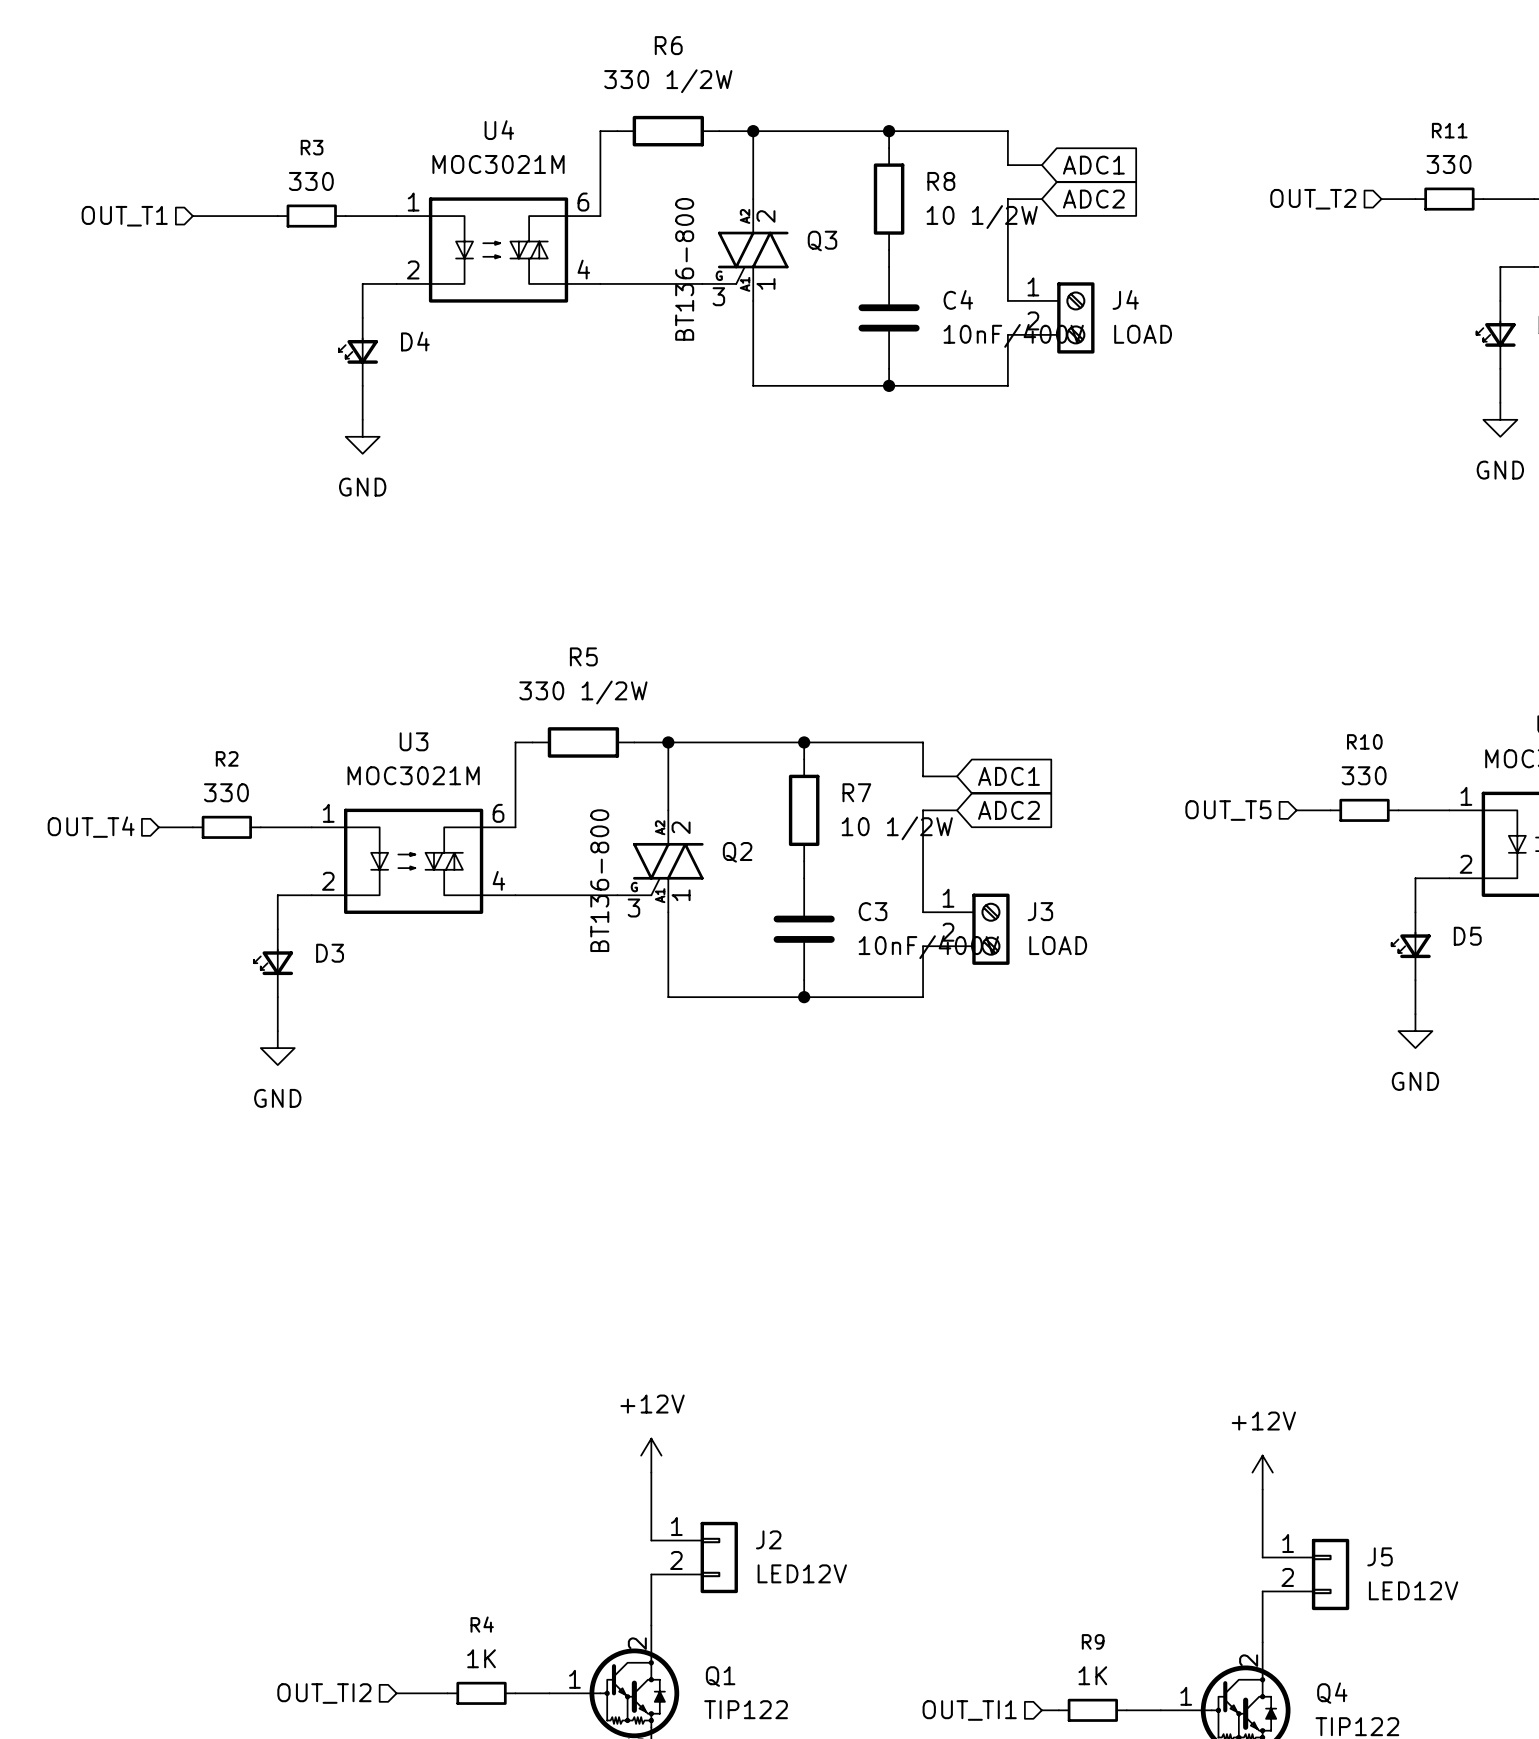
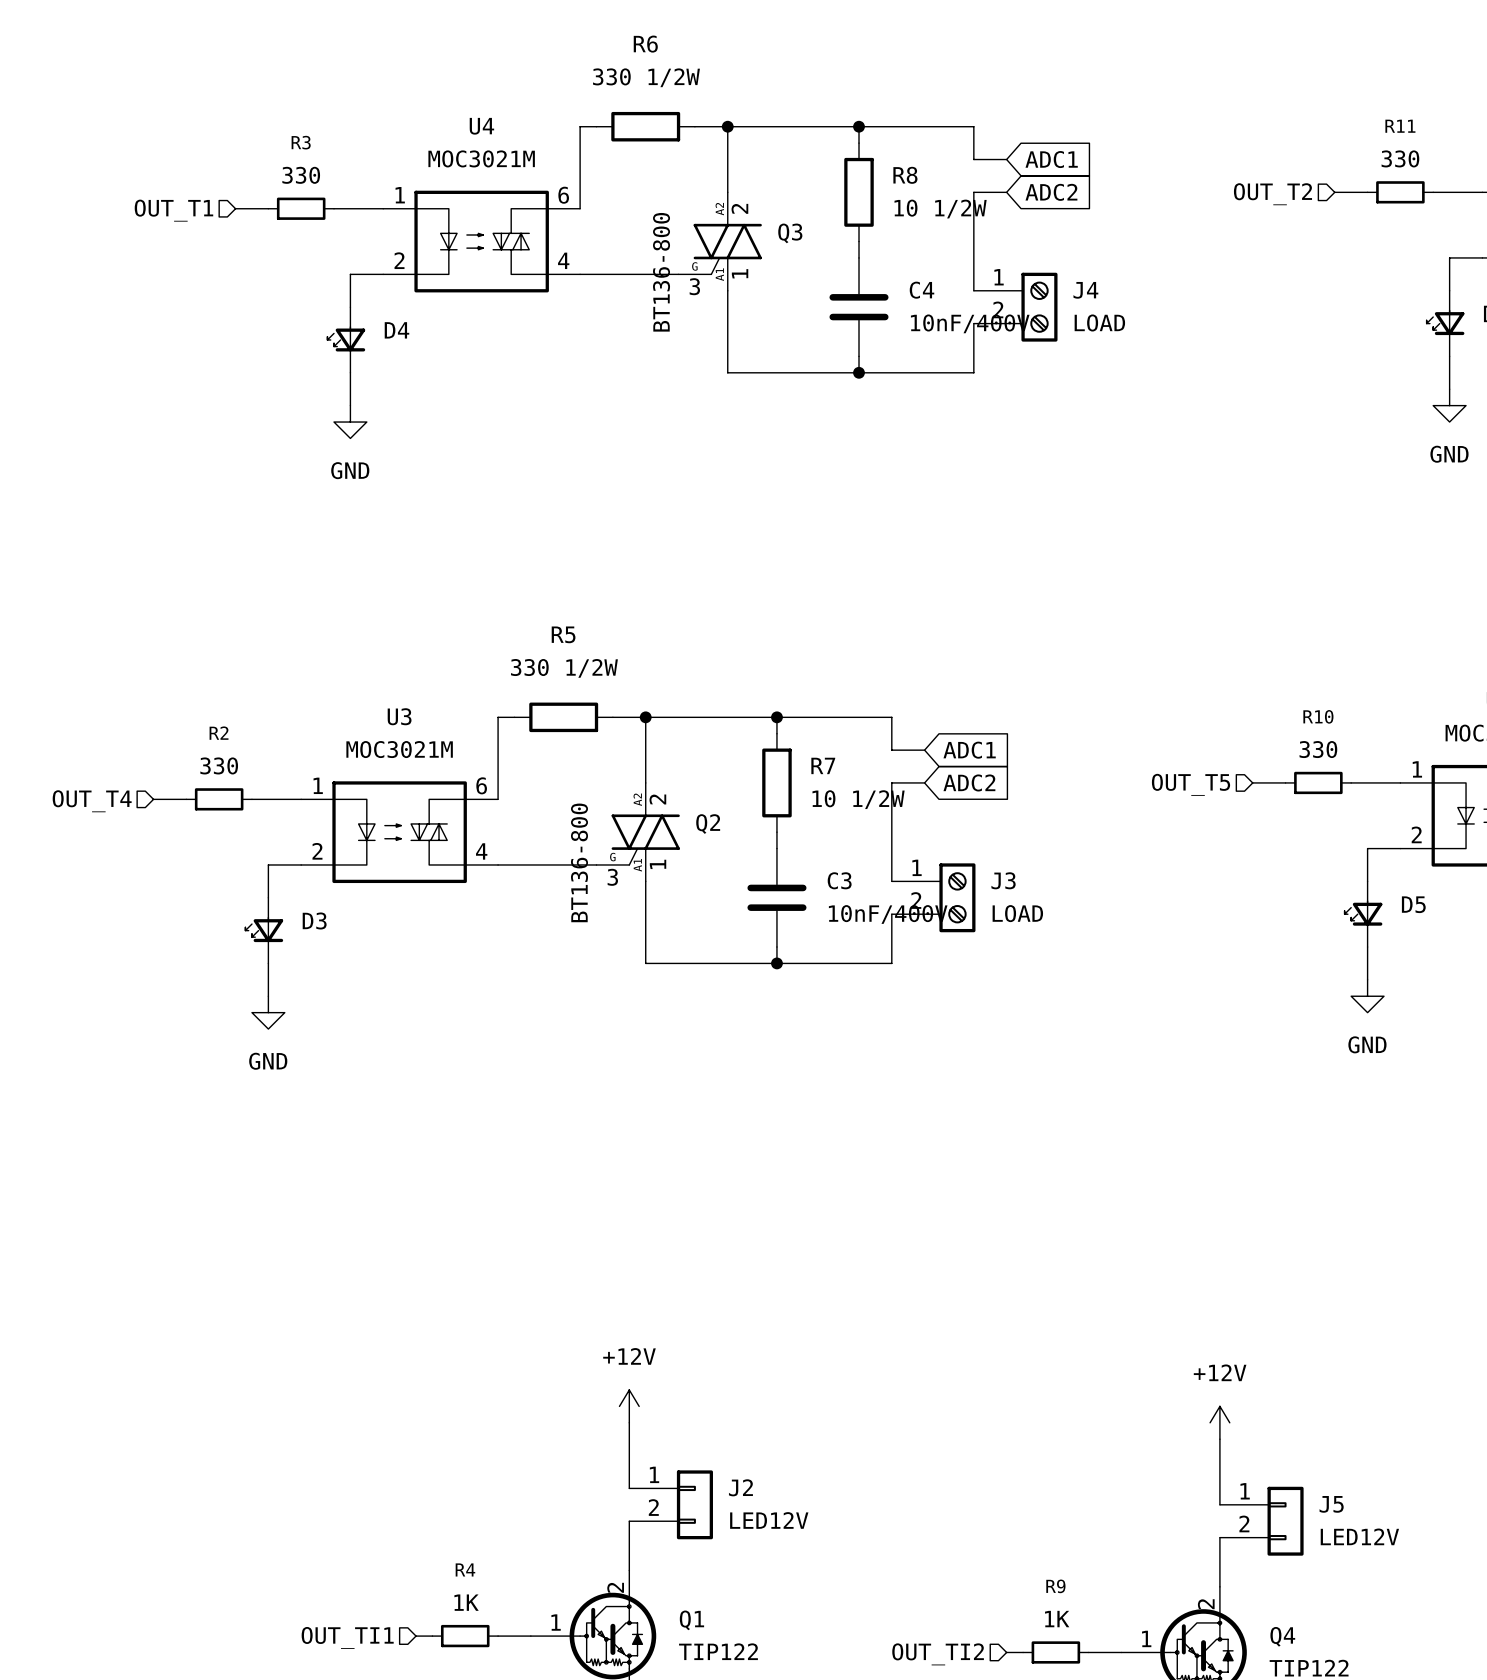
hierarchical label position: OUT_T1 (124, 216) -> OUT_T1 (173, 210)
wire: (192, 216) (243, 216) -> none
hierarchical label: OUT_TI2 (324, 1693) -> OUT_TI1 (347, 1637)
wire: (396, 1693) (430, 1693) -> none
hierarchical label: OUT_TI1 (969, 1710) -> OUT_TI2 (938, 1654)

